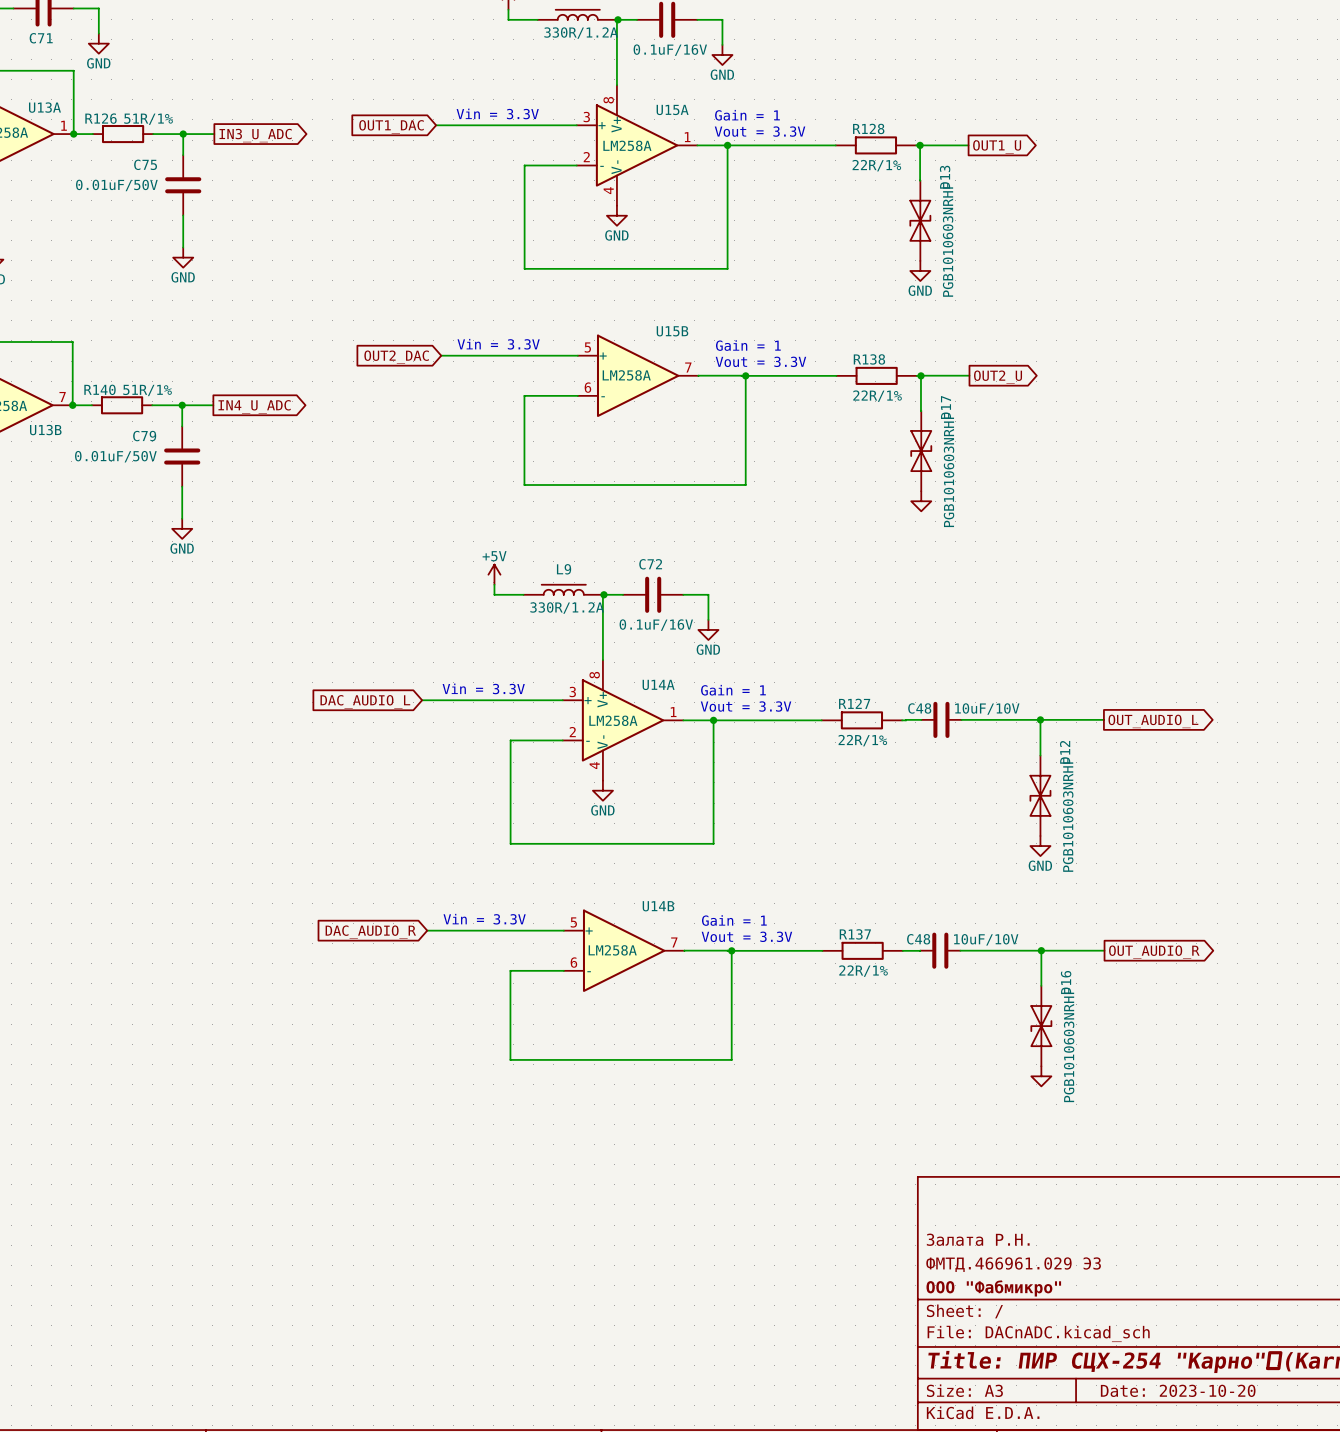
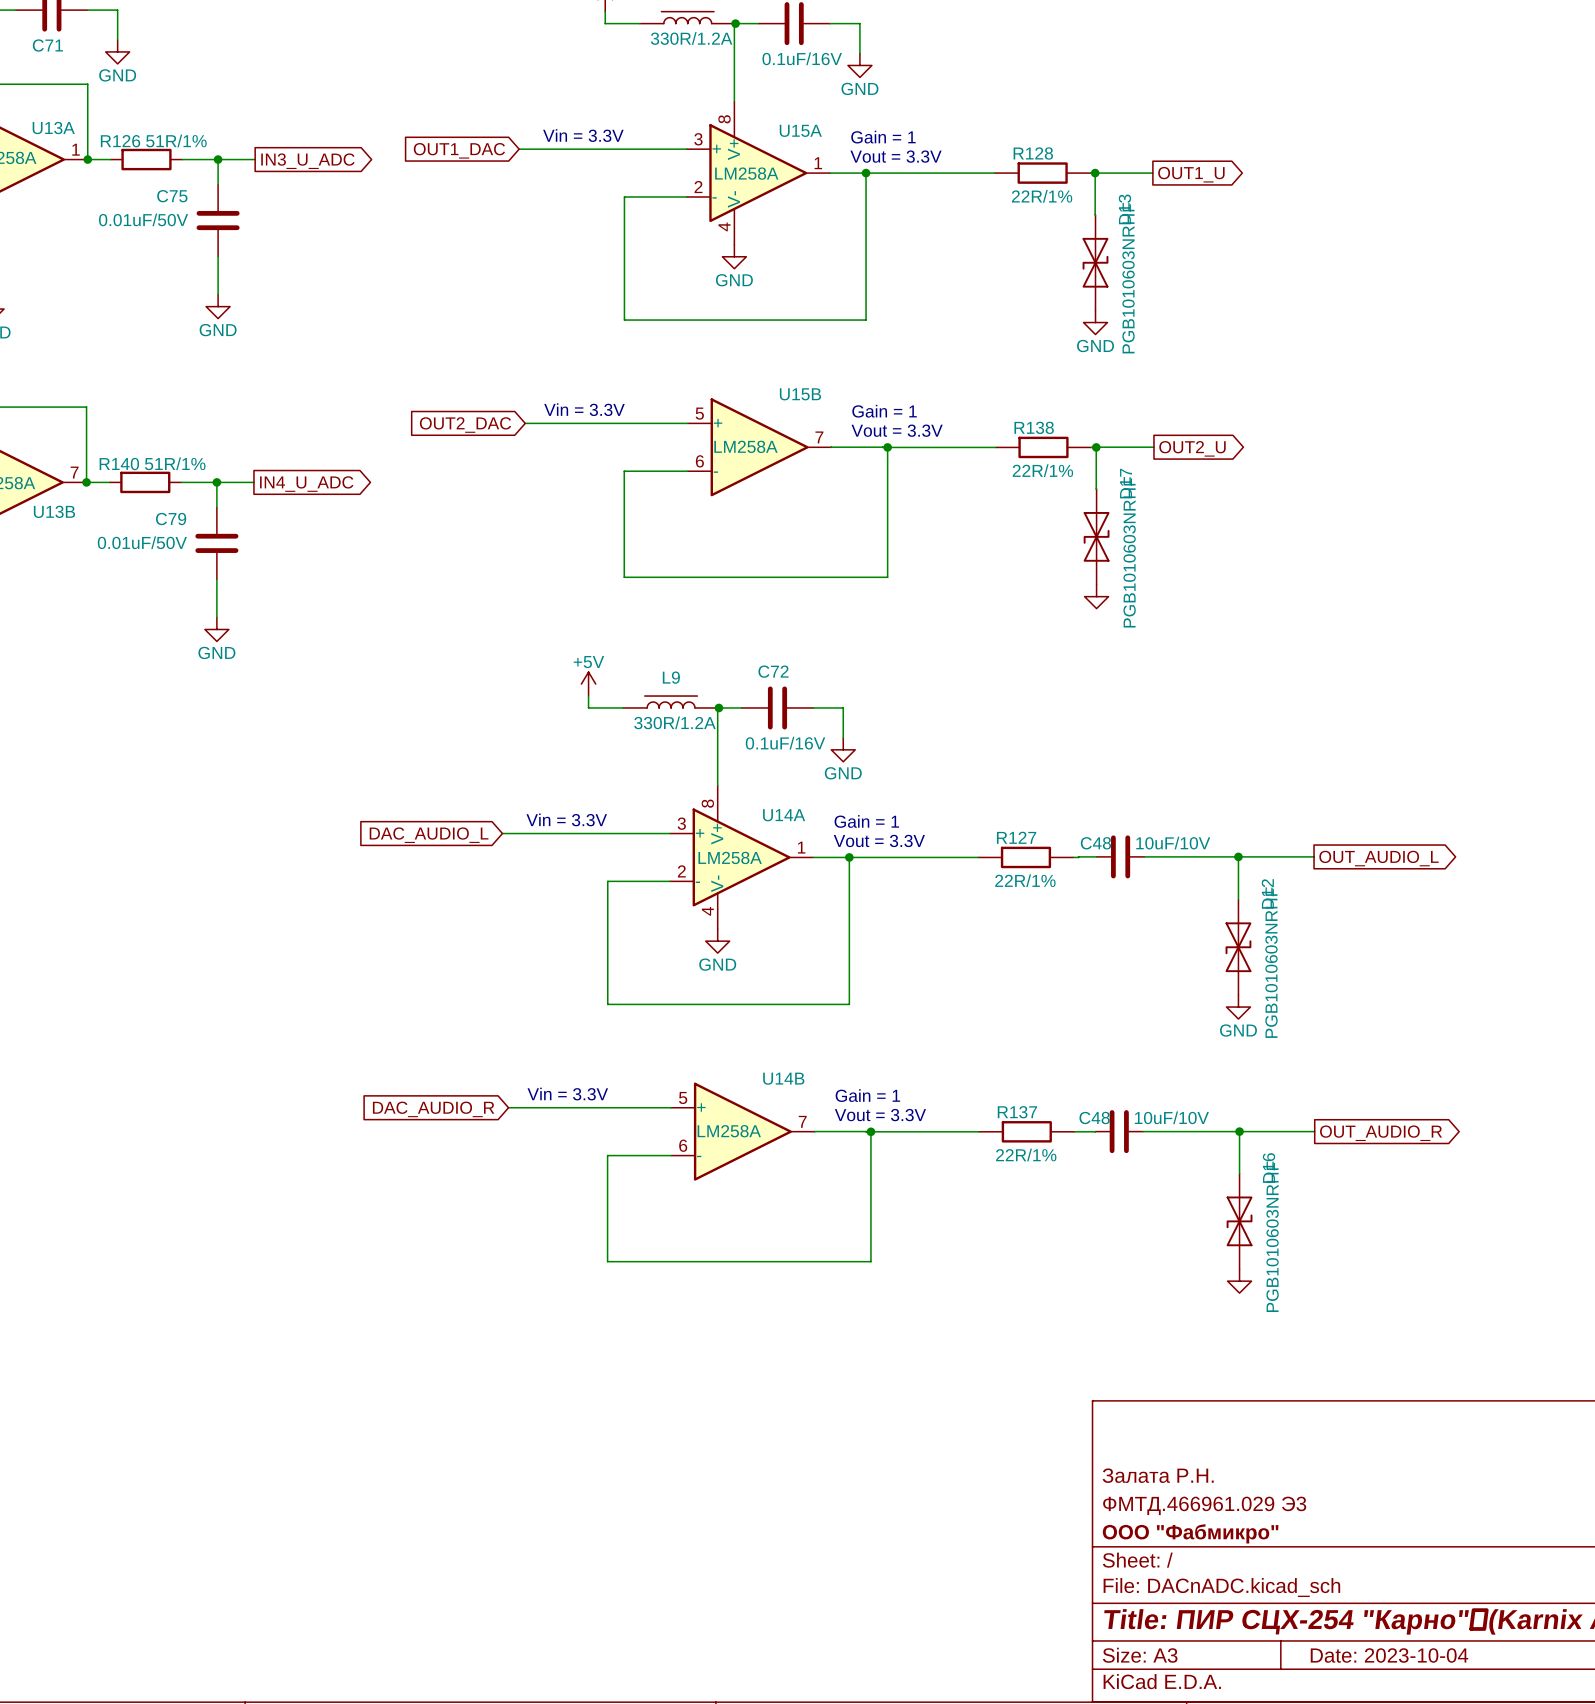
title block: Date: 2023-10-20 (1178, 1390) -> Date: 2023-10-04 (1389, 1655)

